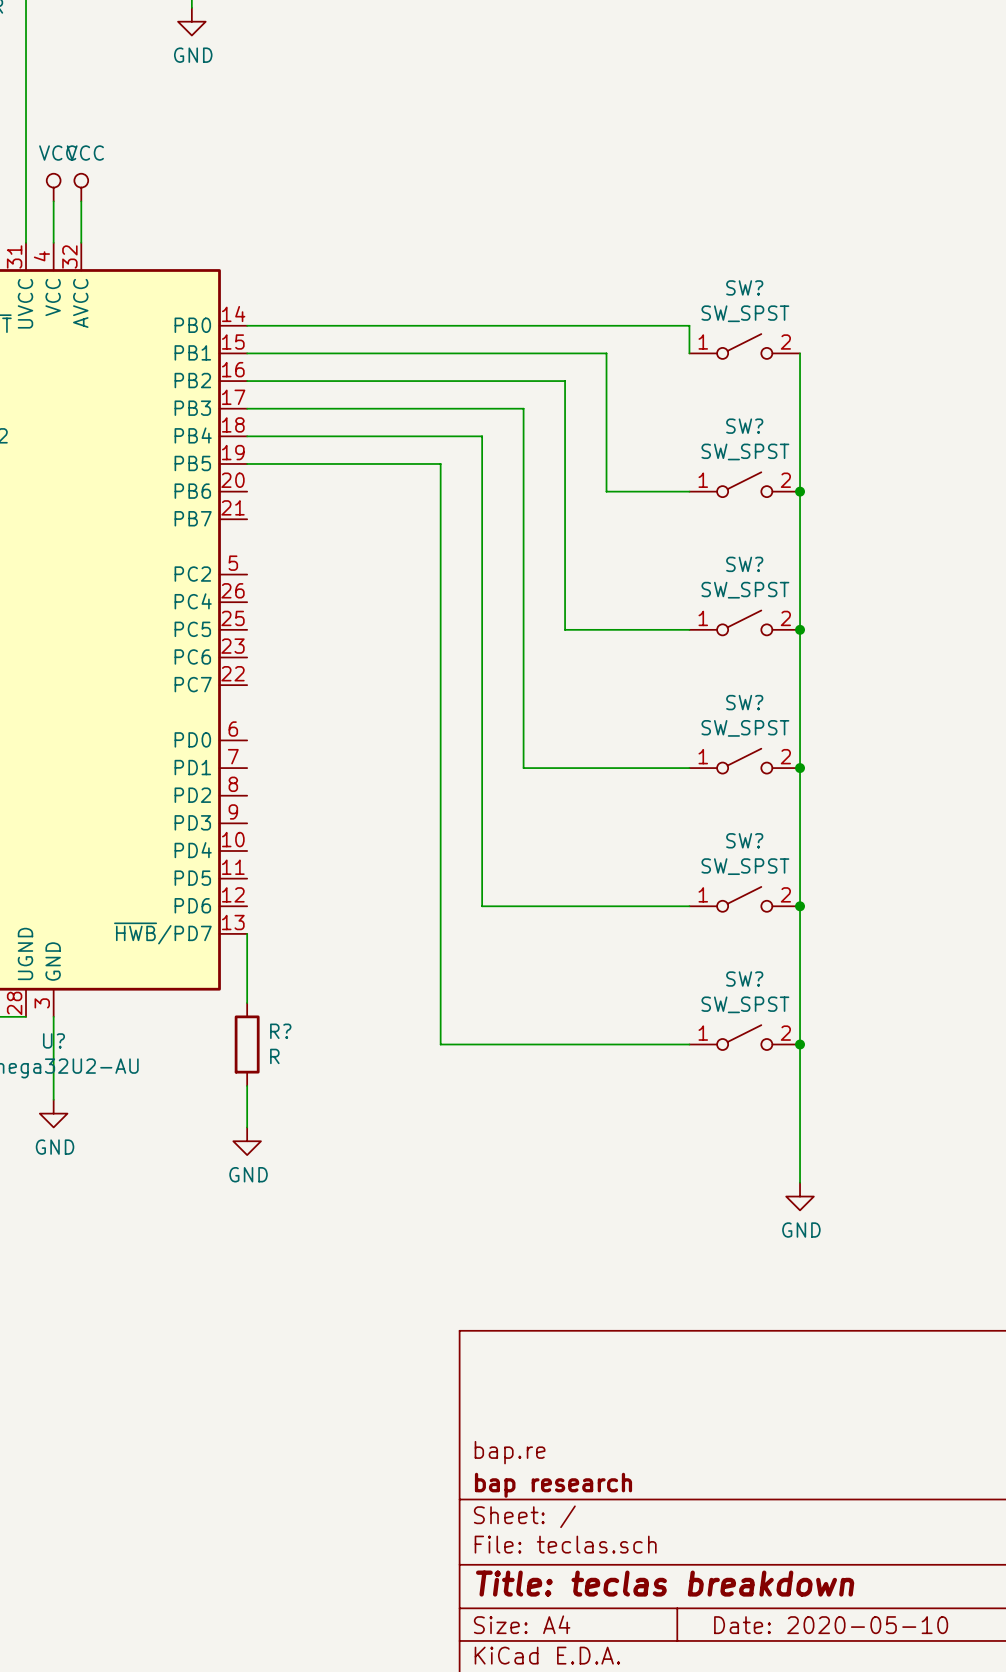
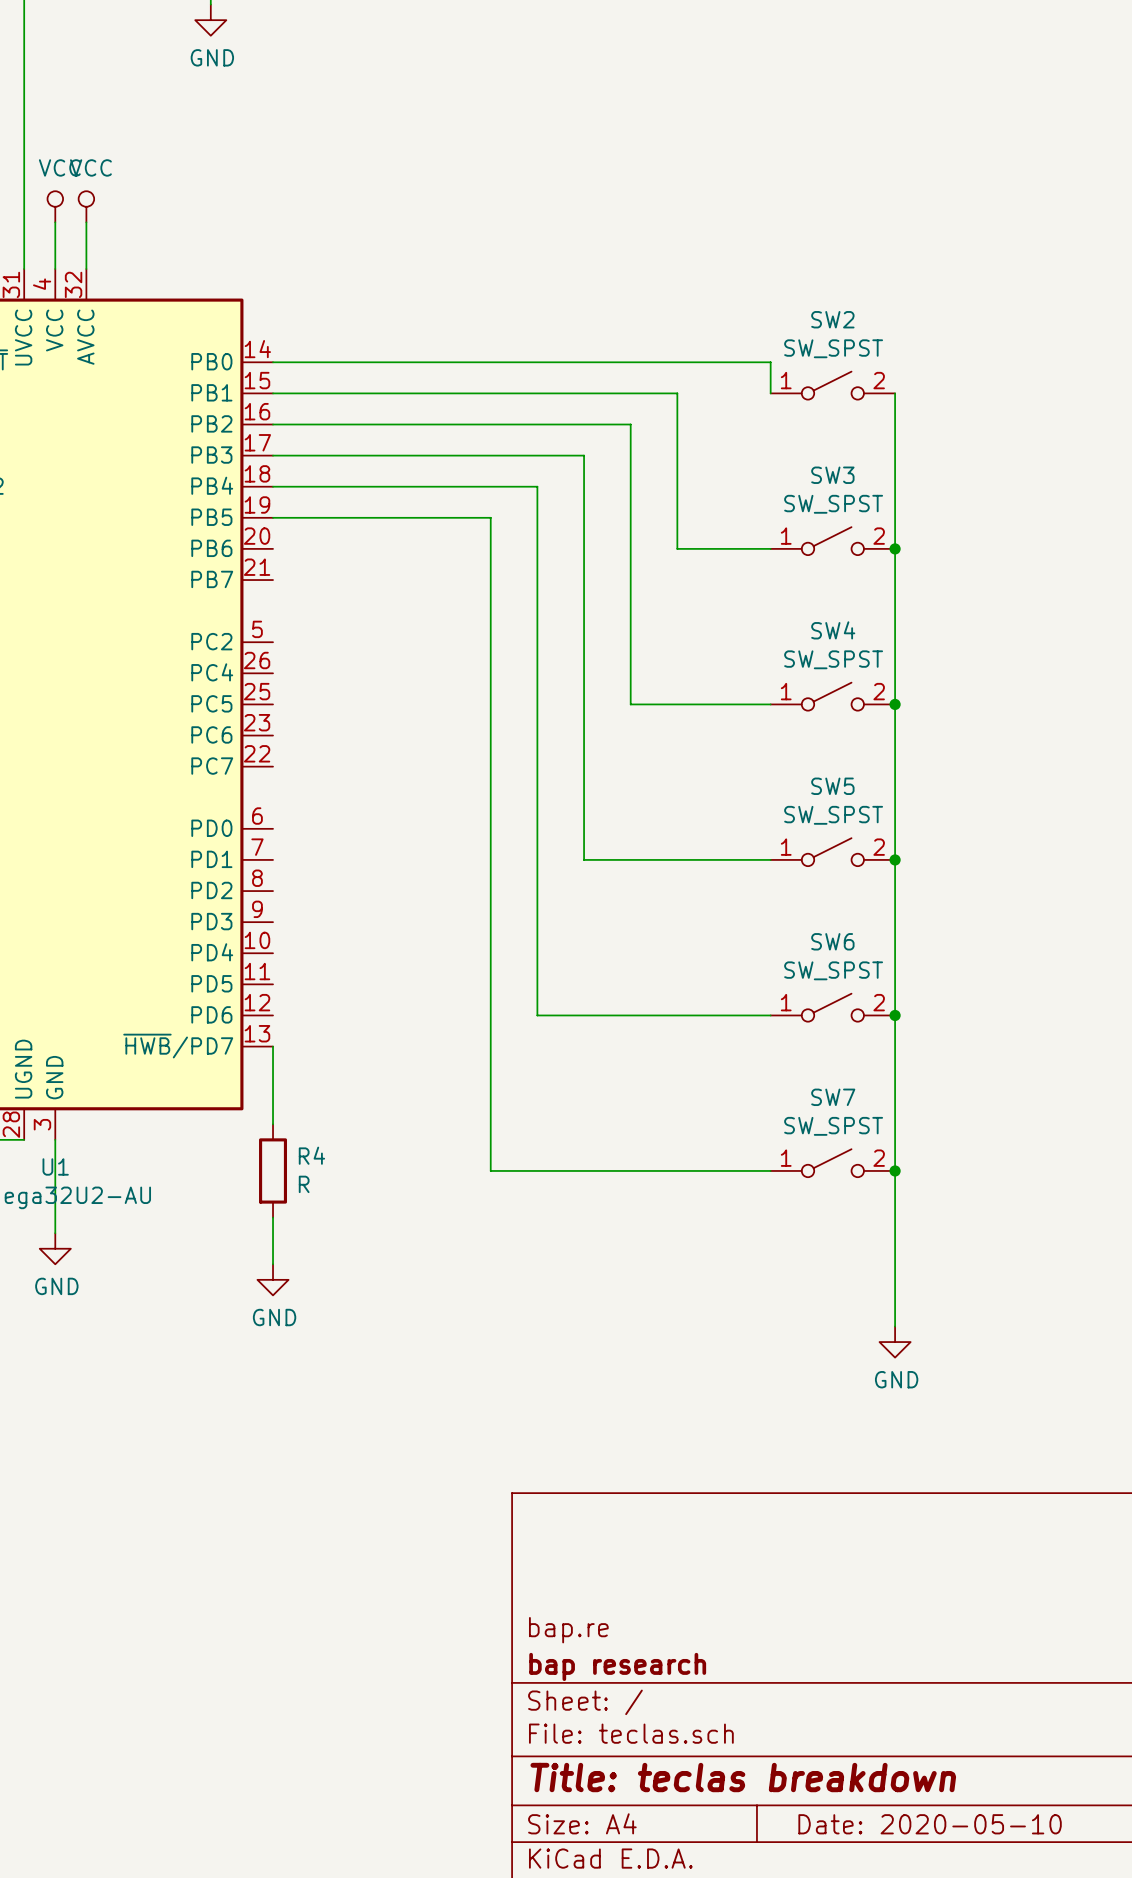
SW? name: SW? (744, 287) -> SW2 (832, 319)
SW? name: SW? (744, 426) -> SW3 (832, 475)
SW? name: SW? (744, 564) -> SW4 (833, 630)
SW? name: SW? (744, 702) -> SW5 (832, 786)
SW? name: SW? (744, 840) -> SW6 (832, 941)
SW? name: SW? (744, 979) -> SW7 (833, 1097)
R? name: R? (280, 1031) -> R4 (311, 1155)
U? name: U? (53, 1040) -> U1 (55, 1166)

